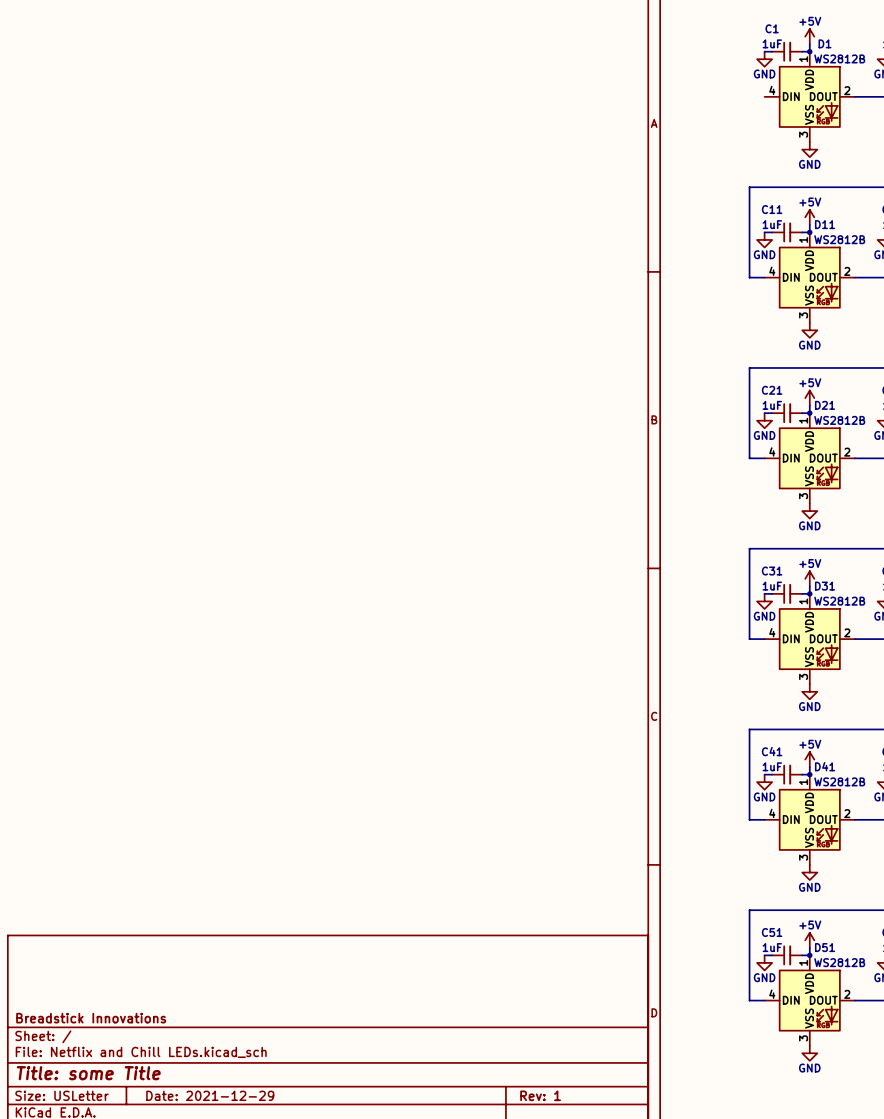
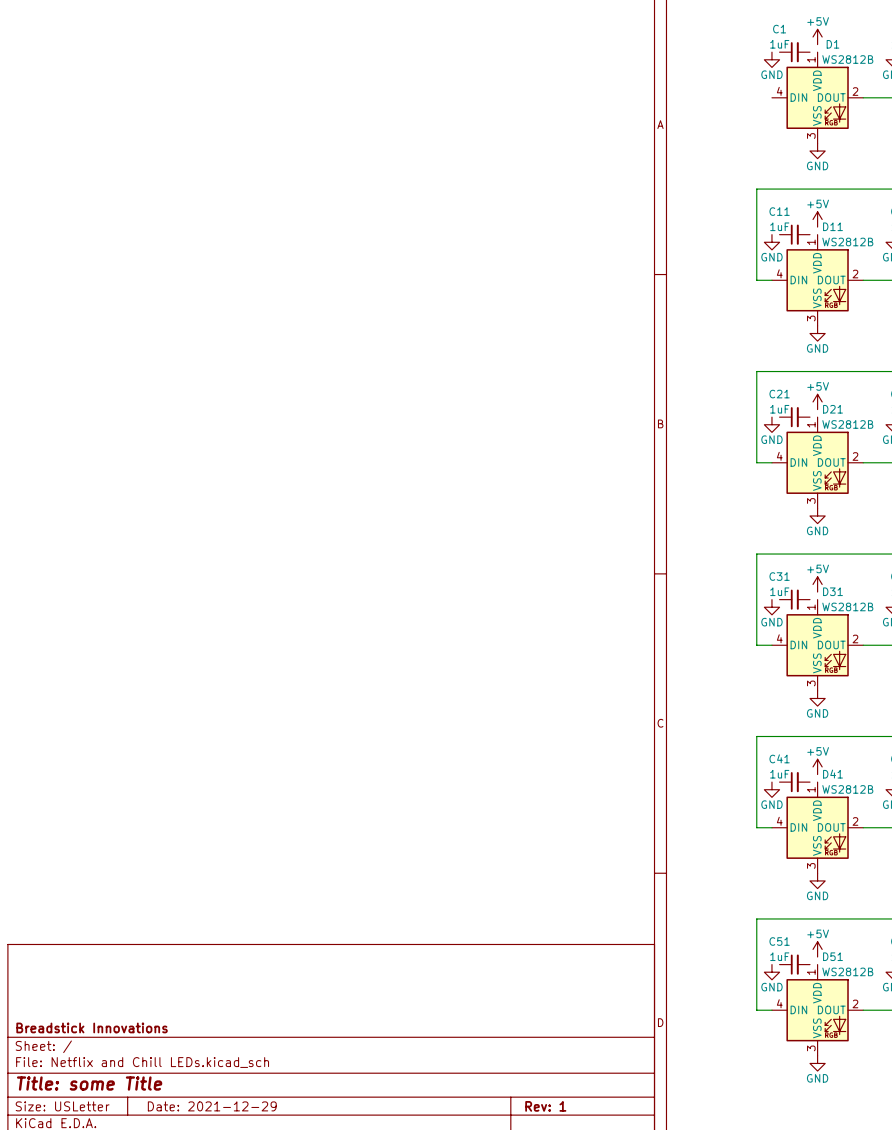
wire: (809, 44) (809, 51) (802, 51) -> none
wire: (764, 51) (772, 51) -> none
junction: (809, 51) -> none
wire: (809, 224) (809, 232) (802, 232) -> none
wire: (764, 232) (772, 232) -> none
junction: (809, 232) -> none
wire: (809, 405) (809, 413) (802, 413) -> none
wire: (764, 413) (772, 413) -> none
junction: (809, 413) -> none
wire: (809, 586) (809, 593) (802, 593) -> none
wire: (764, 593) (772, 593) -> none
junction: (809, 593) -> none
wire: (809, 767) (809, 774) (802, 774) -> none
wire: (764, 774) (772, 774) -> none
junction: (809, 774) -> none
wire: (809, 947) (809, 955) (802, 955) -> none
wire: (764, 955) (772, 955) -> none
junction: (809, 955) -> none

